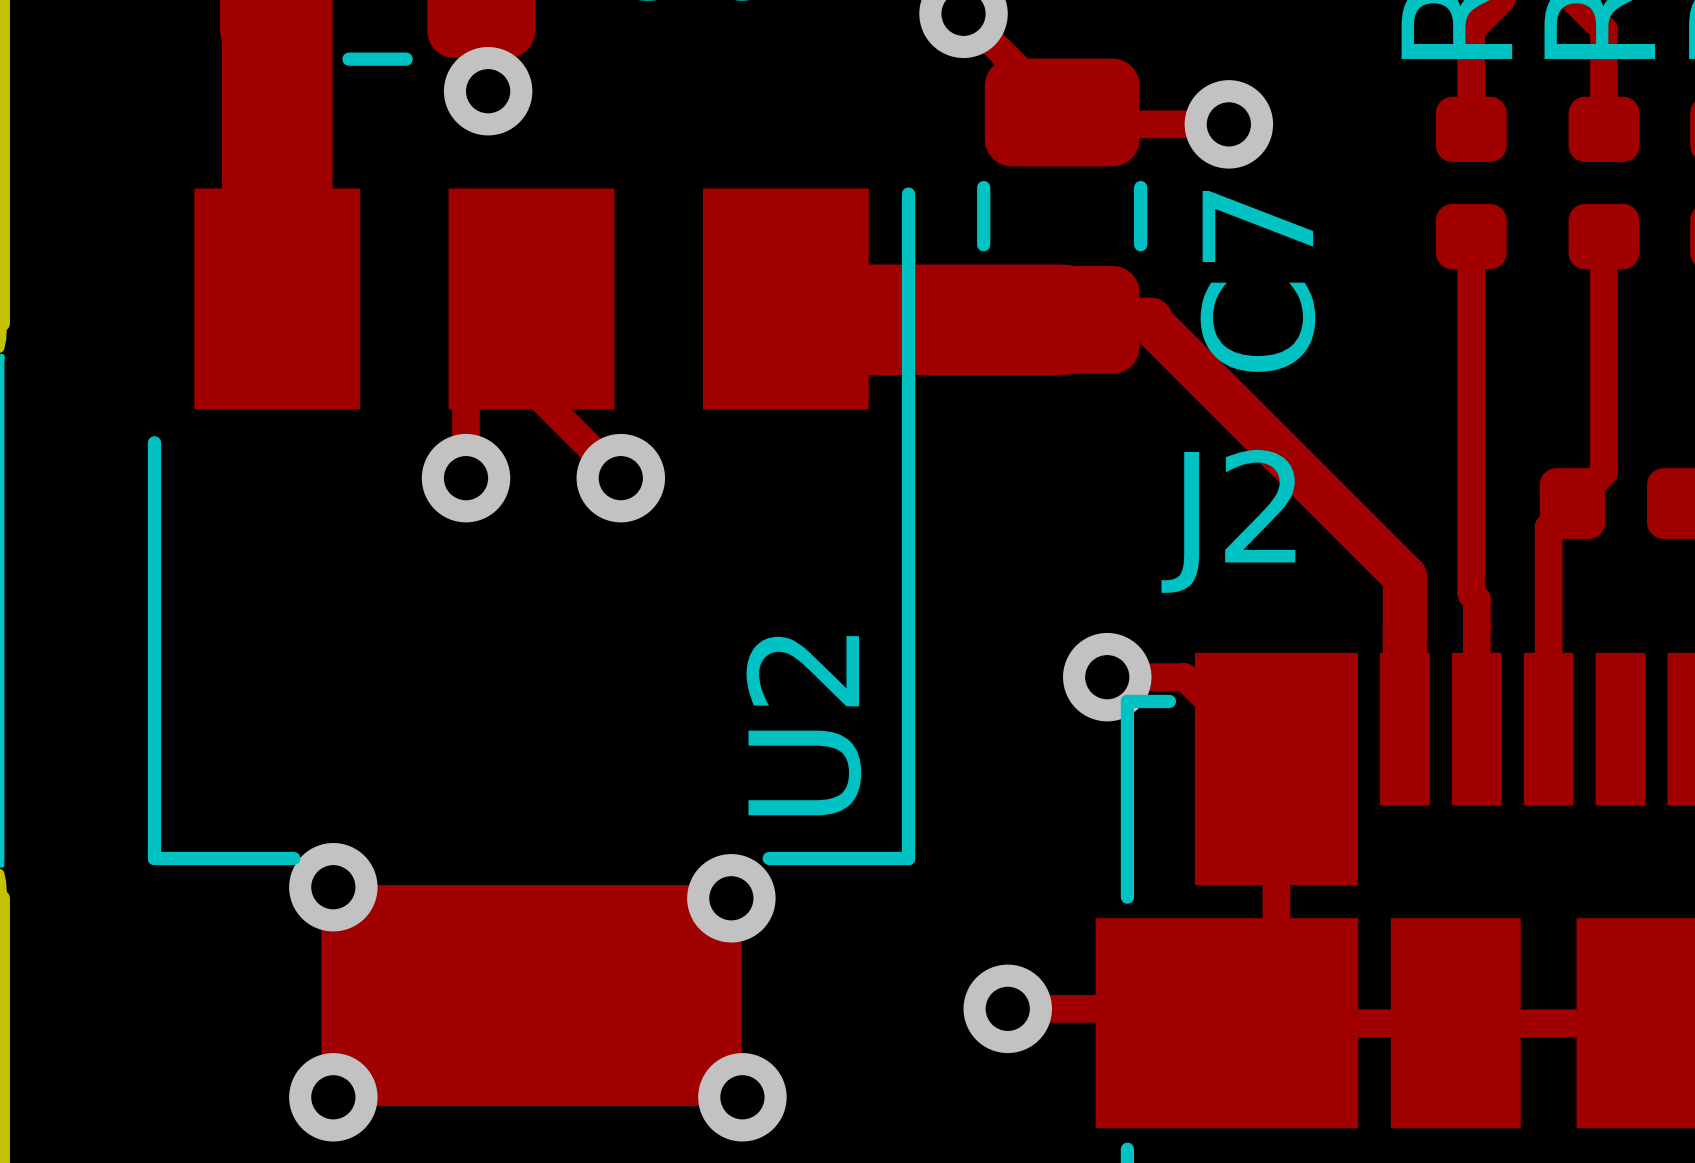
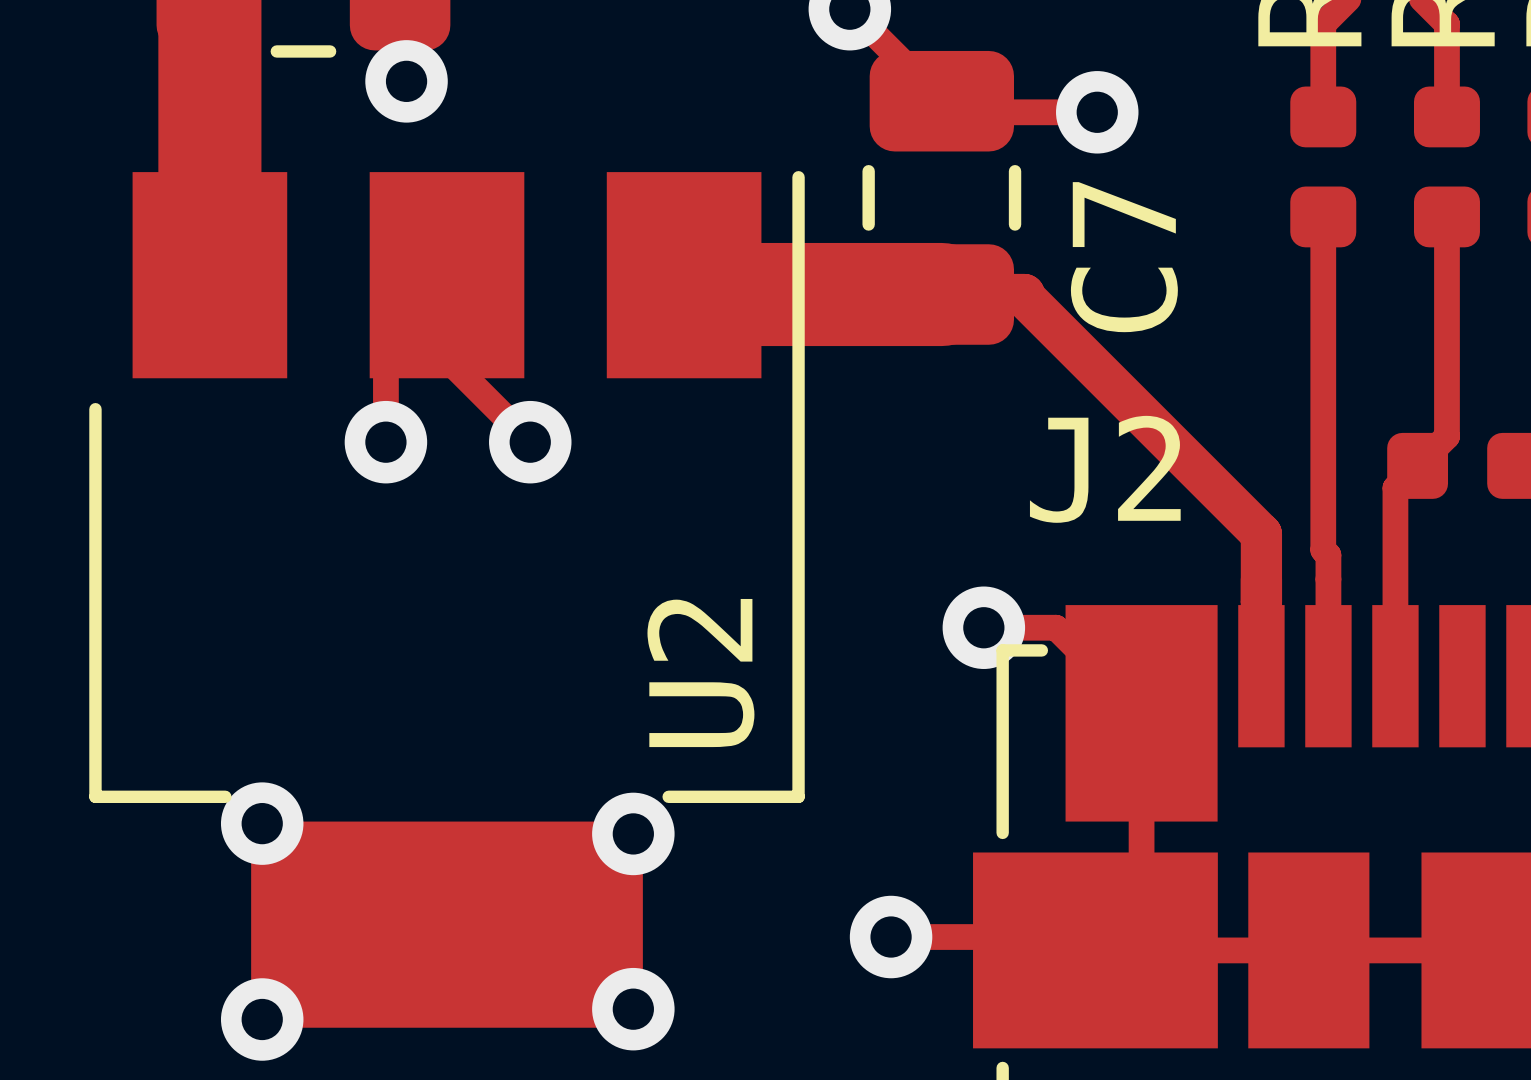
via position: (742, 1097) -> (633, 1009)

